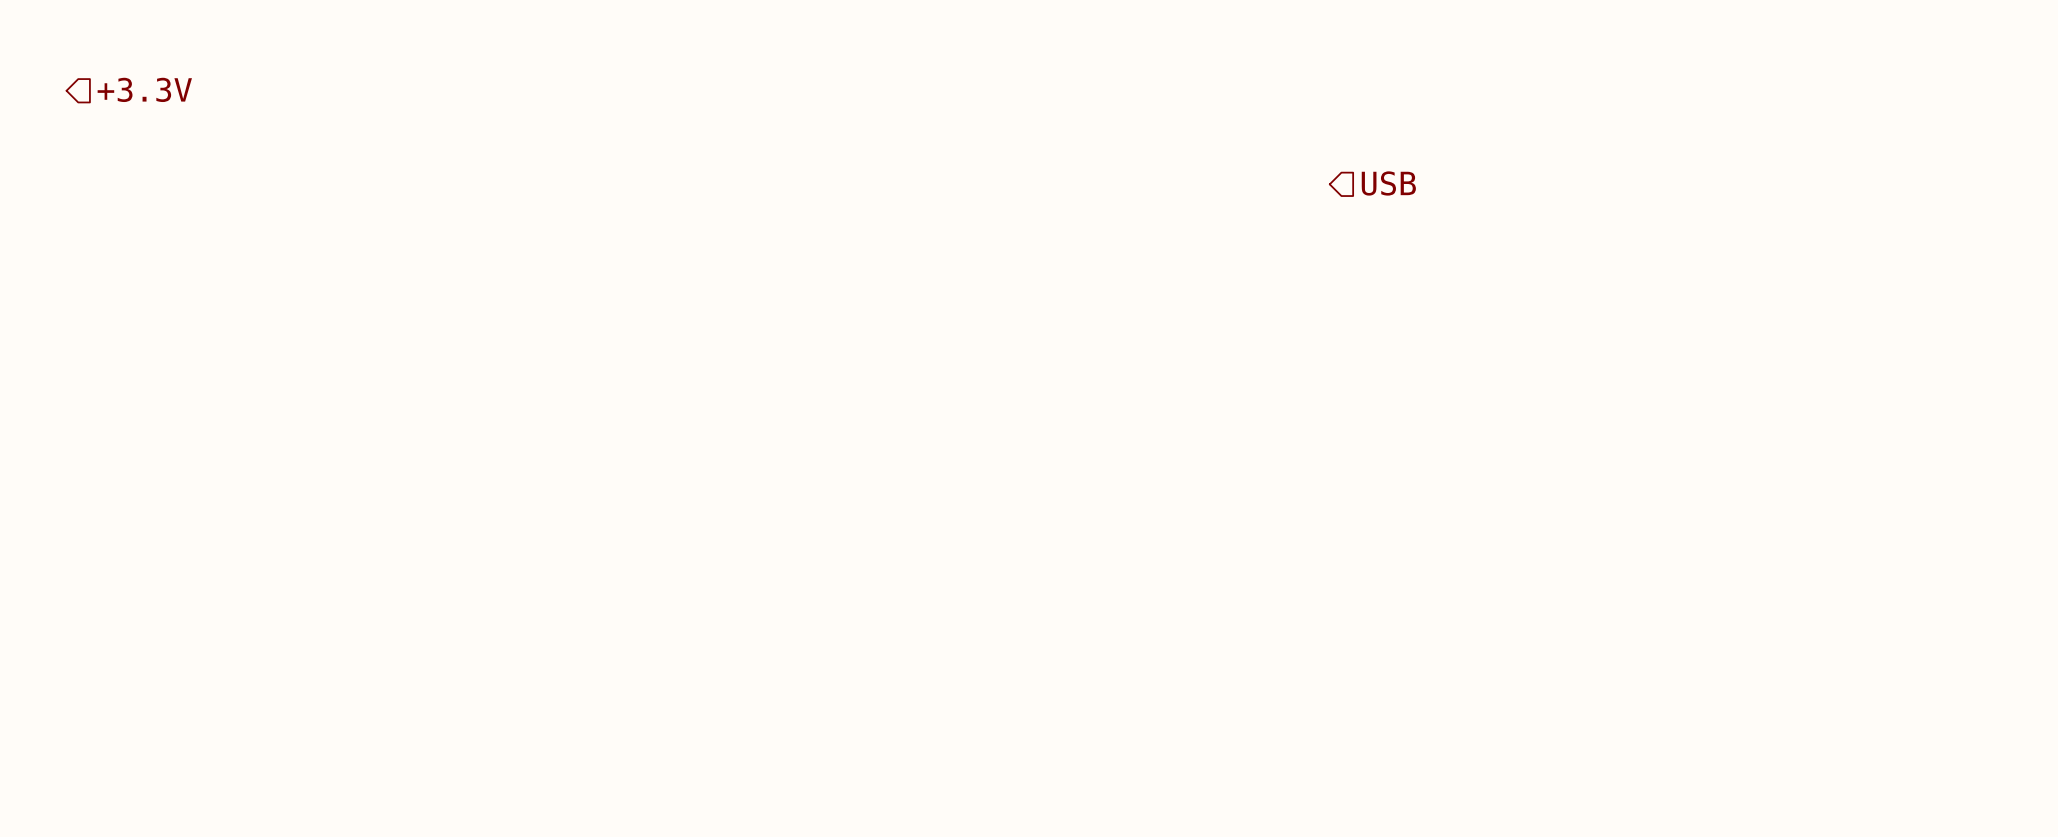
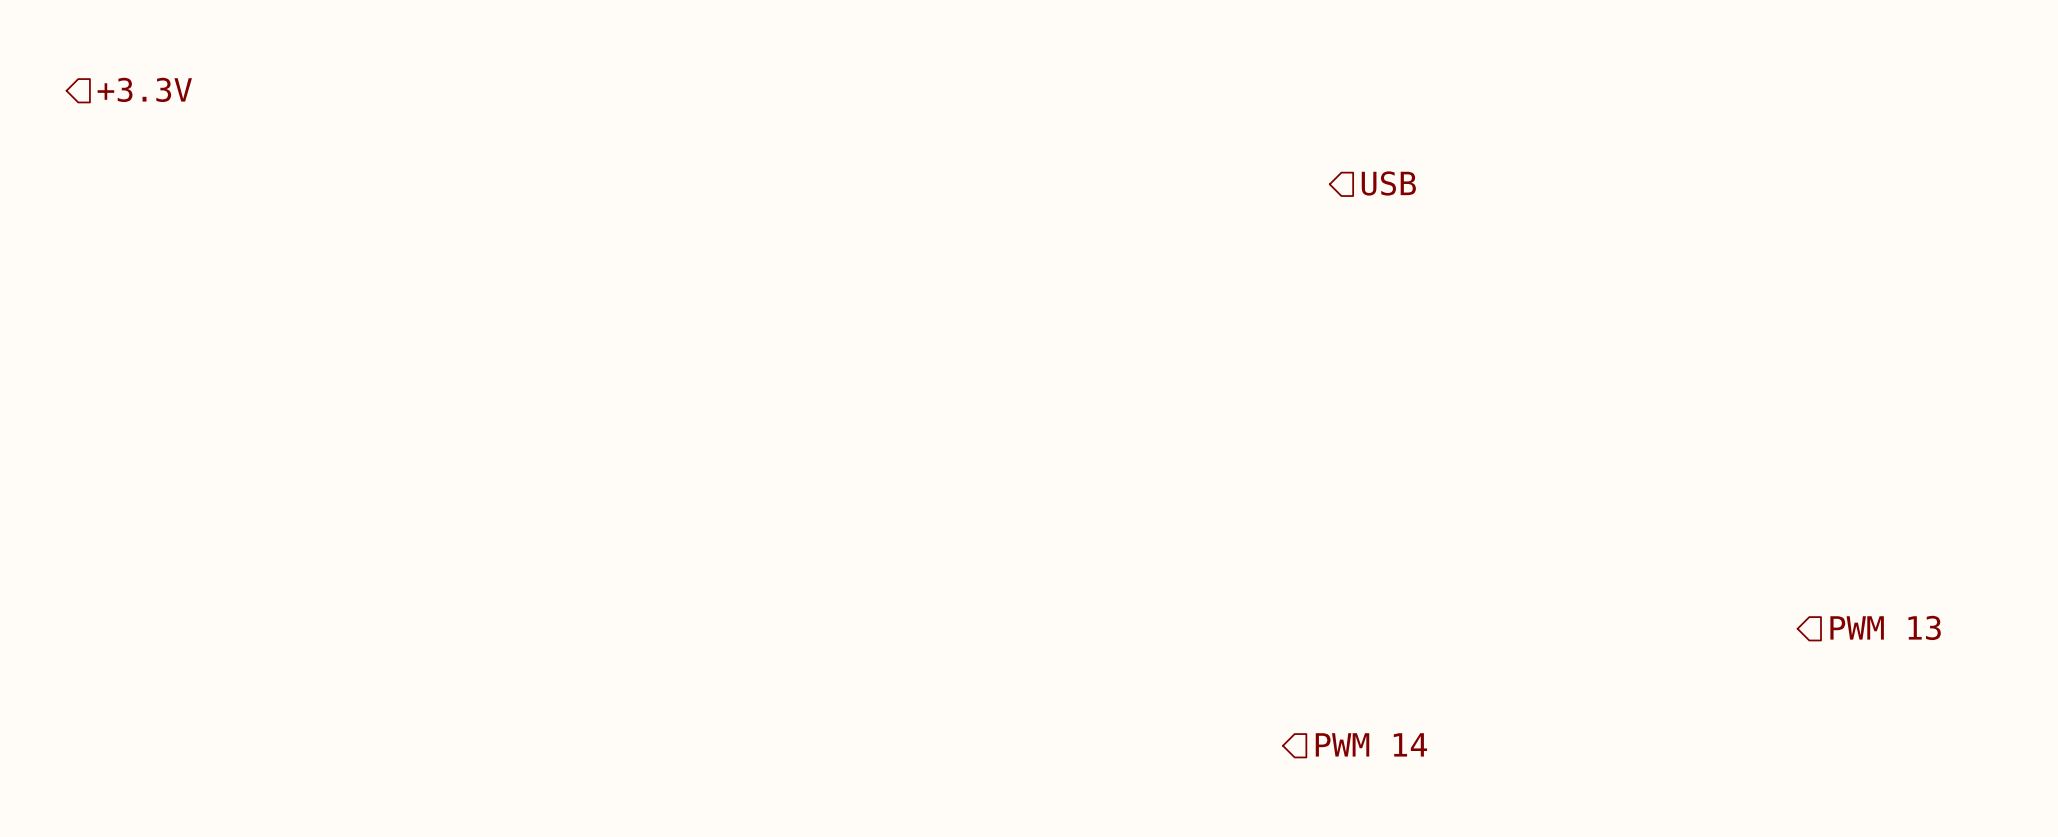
hierarchical label: none -> PWM 13 (1885, 627)
hierarchical label: none -> PWM 14 (1371, 744)

